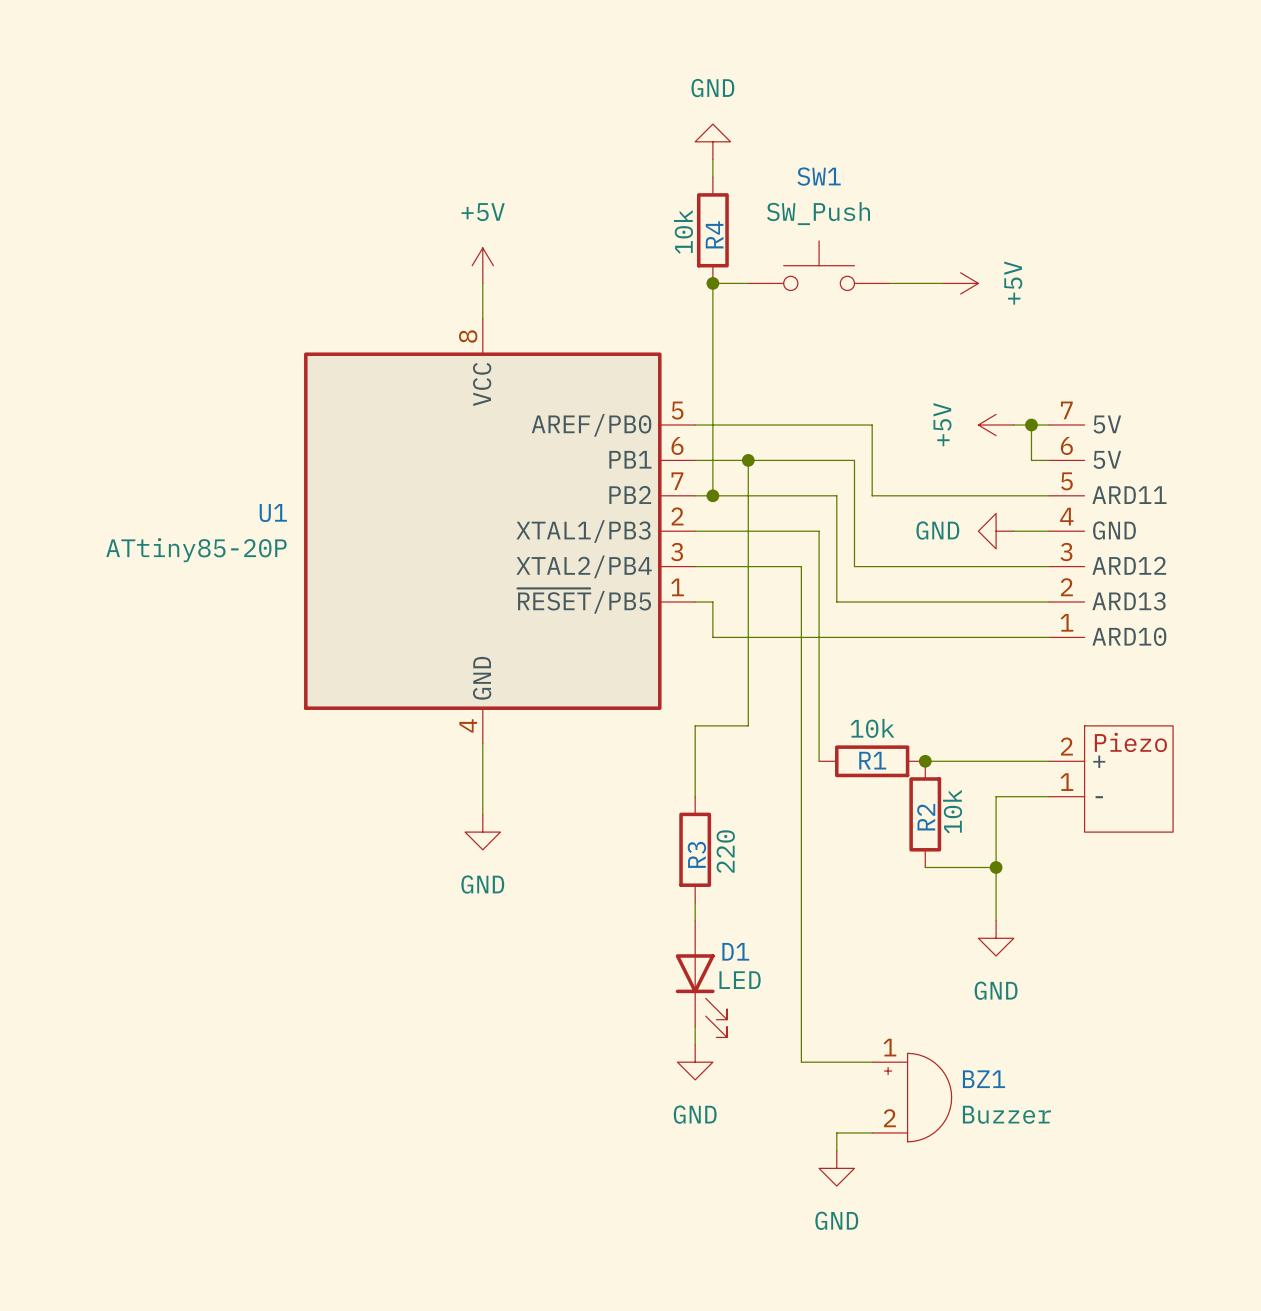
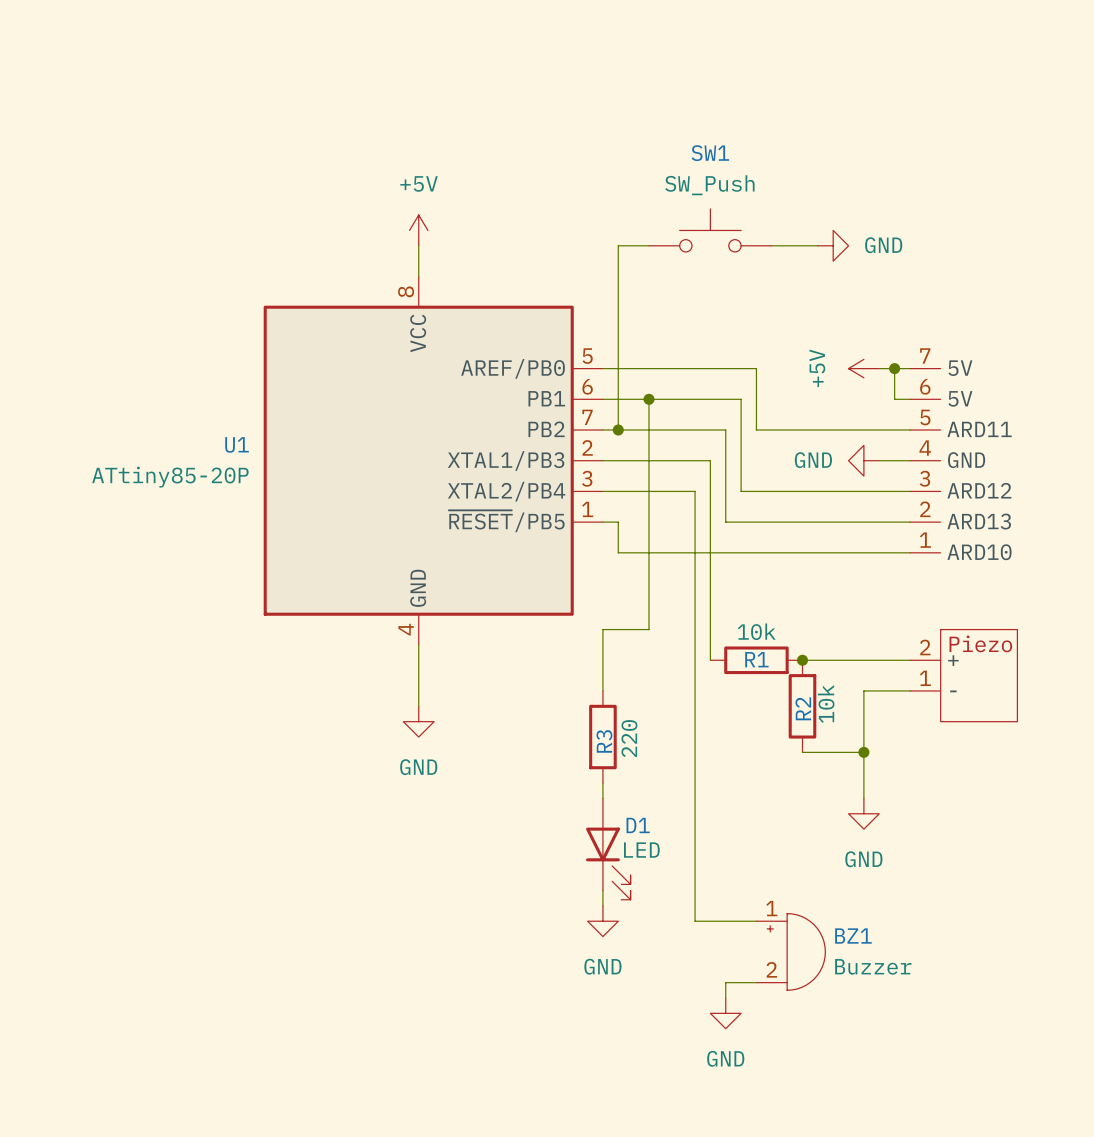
power symbol: GND (712, 141) -> none
wire: (712, 159) (712, 177) -> none
R4: 10k (712, 230) -> none
junction: (712, 283) -> none
power symbol: +5V (960, 283) -> GND (833, 245)

